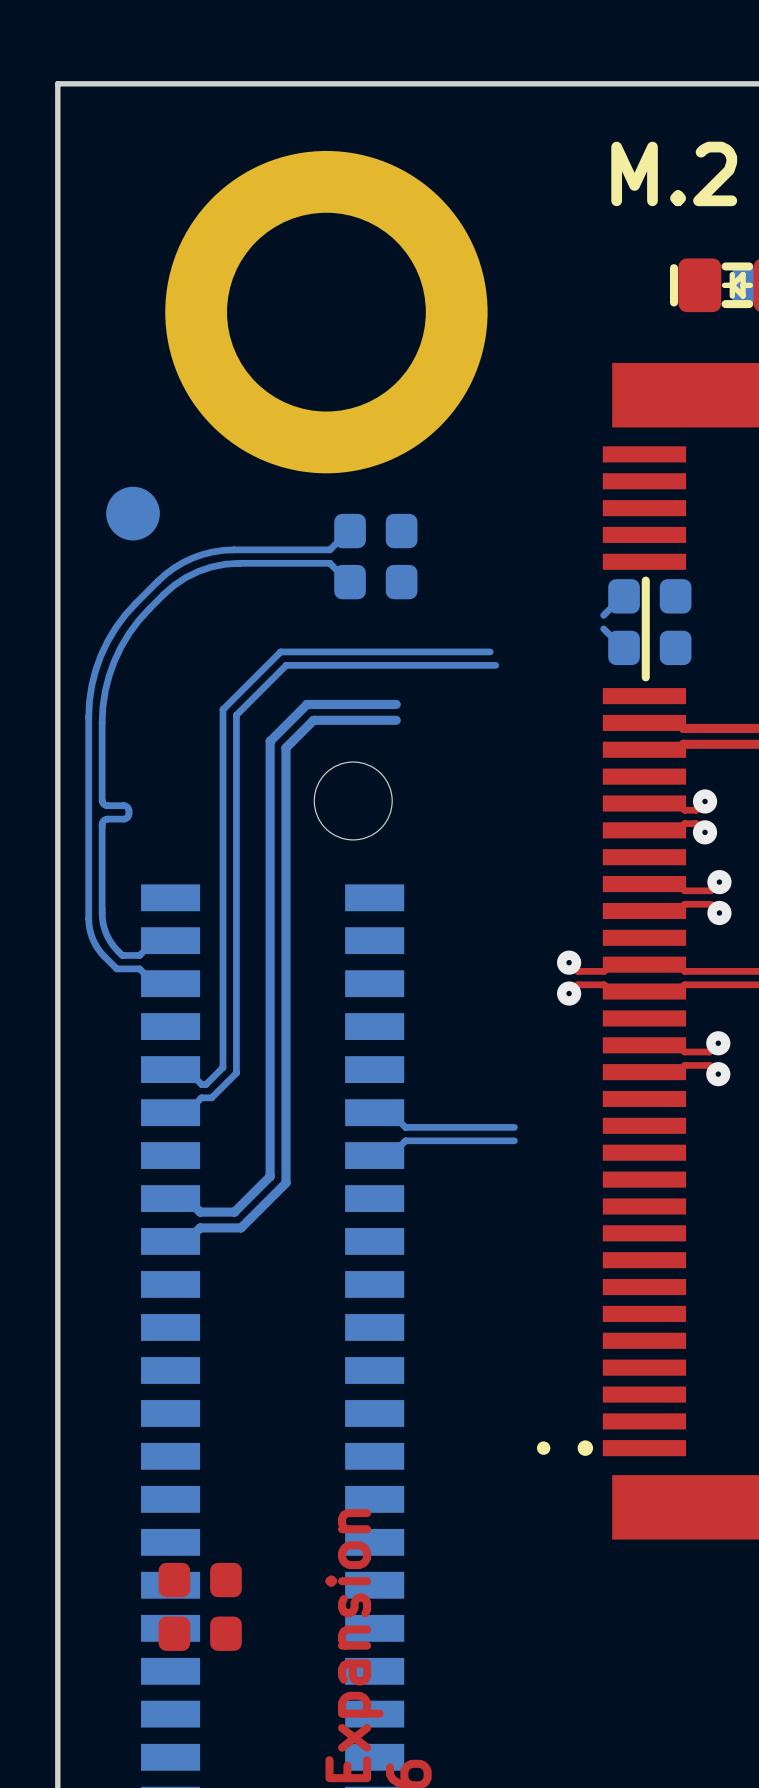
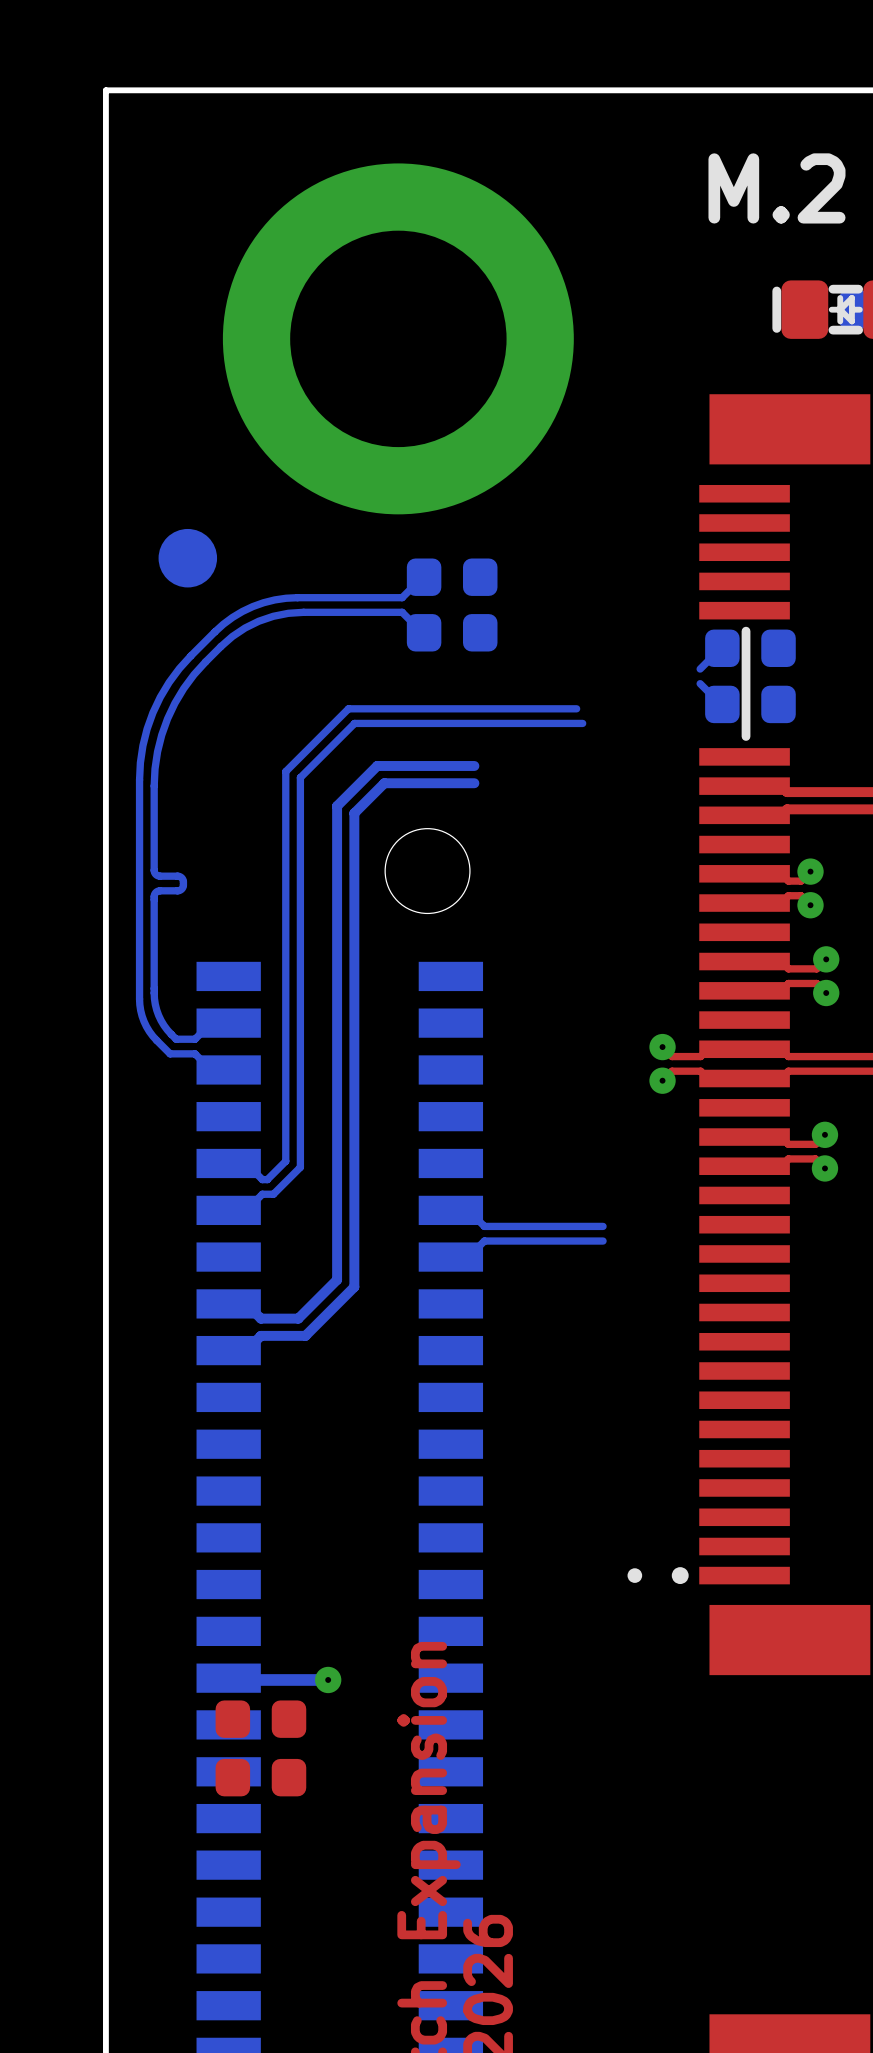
bottom track: none -> (228, 1678) (230, 1679) (328, 1679)
via: none -> (328, 1679)

